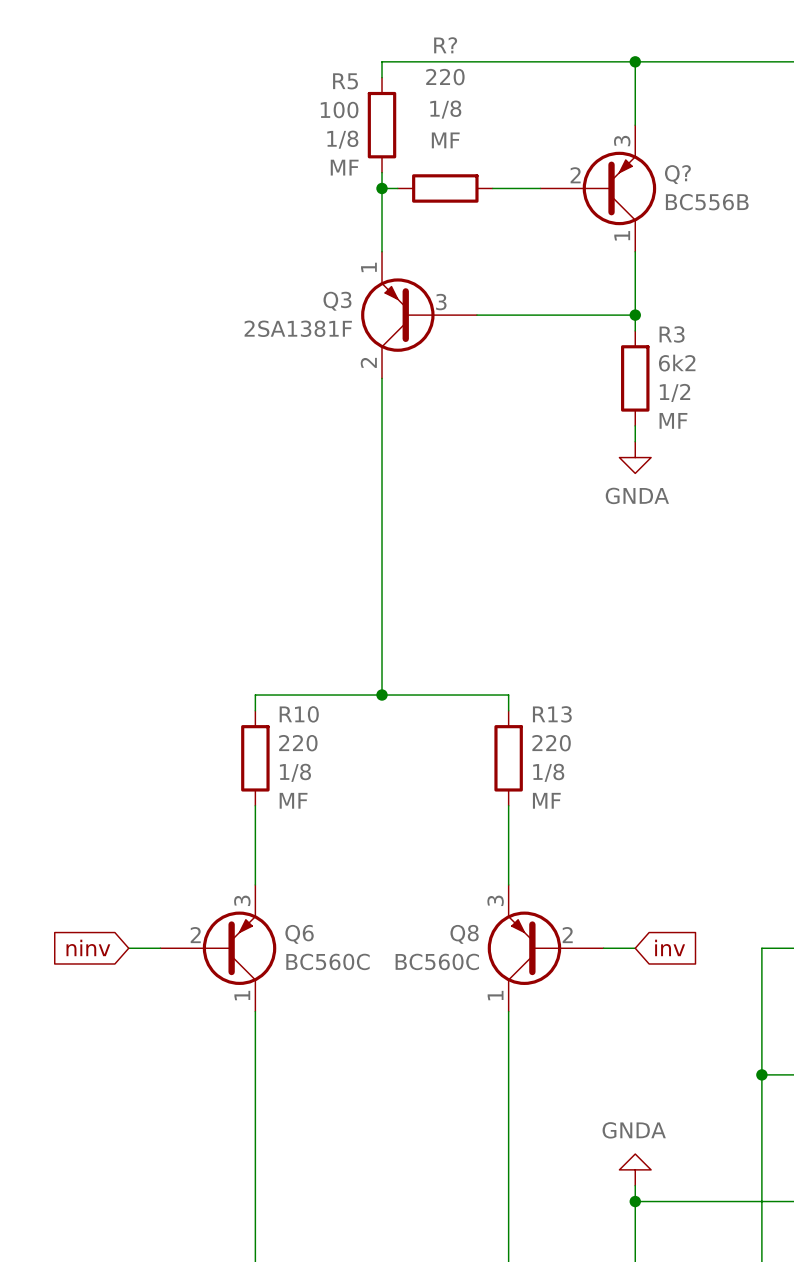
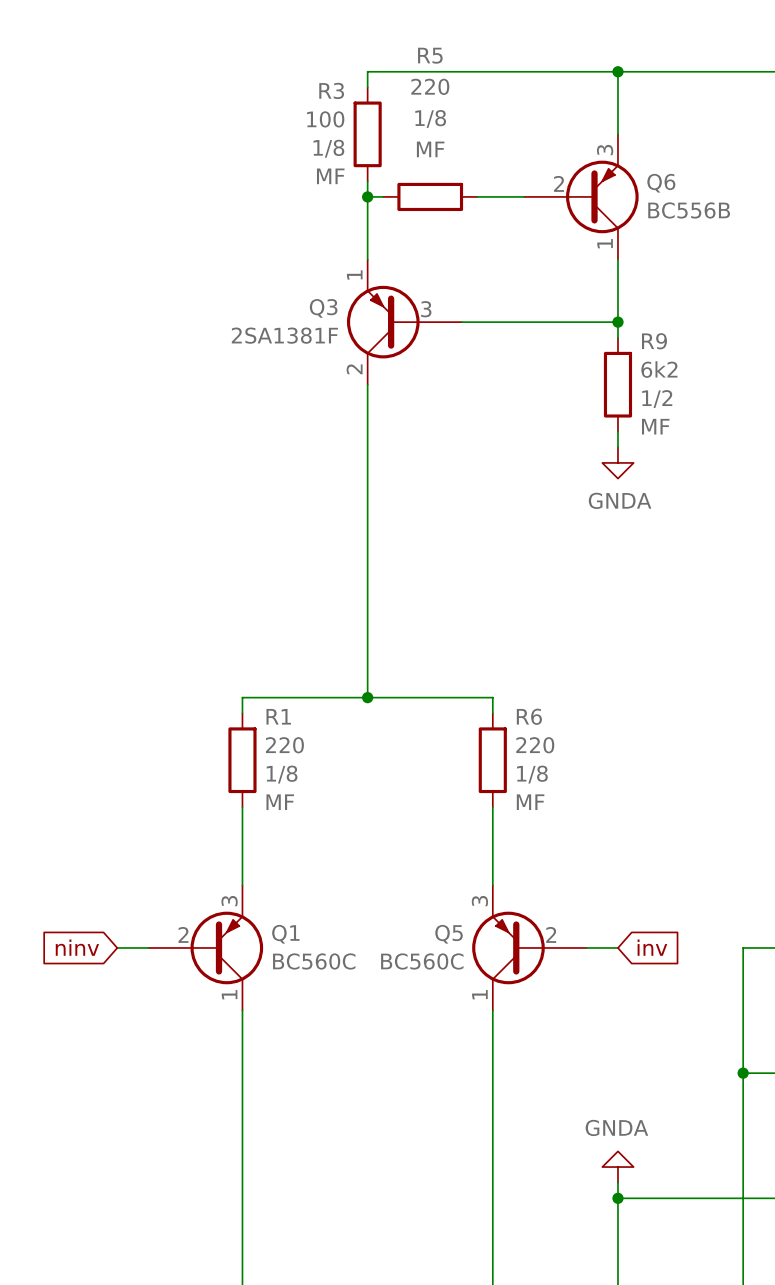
R? name: R? (445, 45) -> R5 (430, 55)
R5 name: R5 (345, 81) -> R3 (331, 90)
Q? name: Q? (677, 174) -> Q6 (661, 183)
R3 name: R3 (672, 334) -> R9 (654, 341)
R10 name: R10 (299, 714) -> R1 (278, 716)
R13 name: R13 (552, 714) -> R6 (529, 716)
Q6 name: Q6 (299, 934) -> Q1 (285, 934)
Q8 name: Q8 (464, 934) -> Q5 (449, 934)

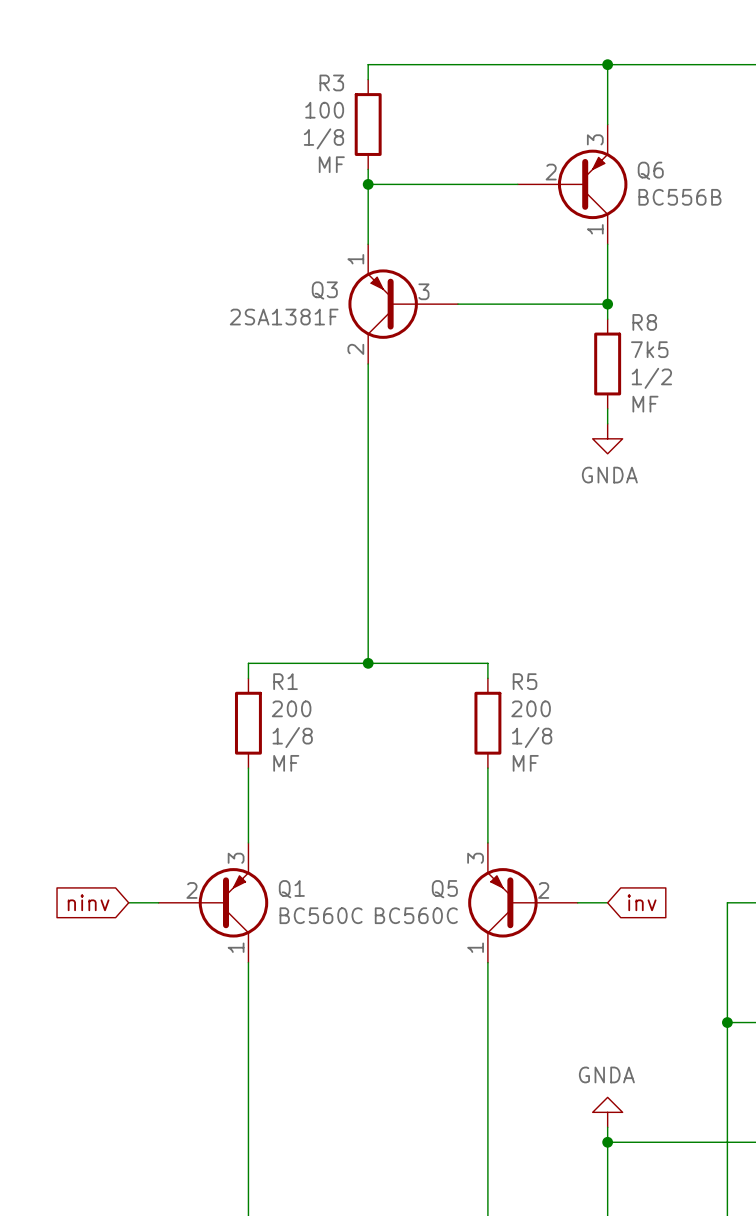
wire: none -> (383, 184) (472, 184)
R5: 220 (430, 196) -> none
R9 name: R9 (654, 341) -> R8 (644, 322)
R9 value: 6k2 (659, 369) -> 7k5 (649, 349)
R6 name: R6 (529, 716) -> R5 (525, 681)
R1 value: 220 (284, 745) -> 200 (291, 708)
R6 value: 220 (535, 745) -> 200 (531, 708)

